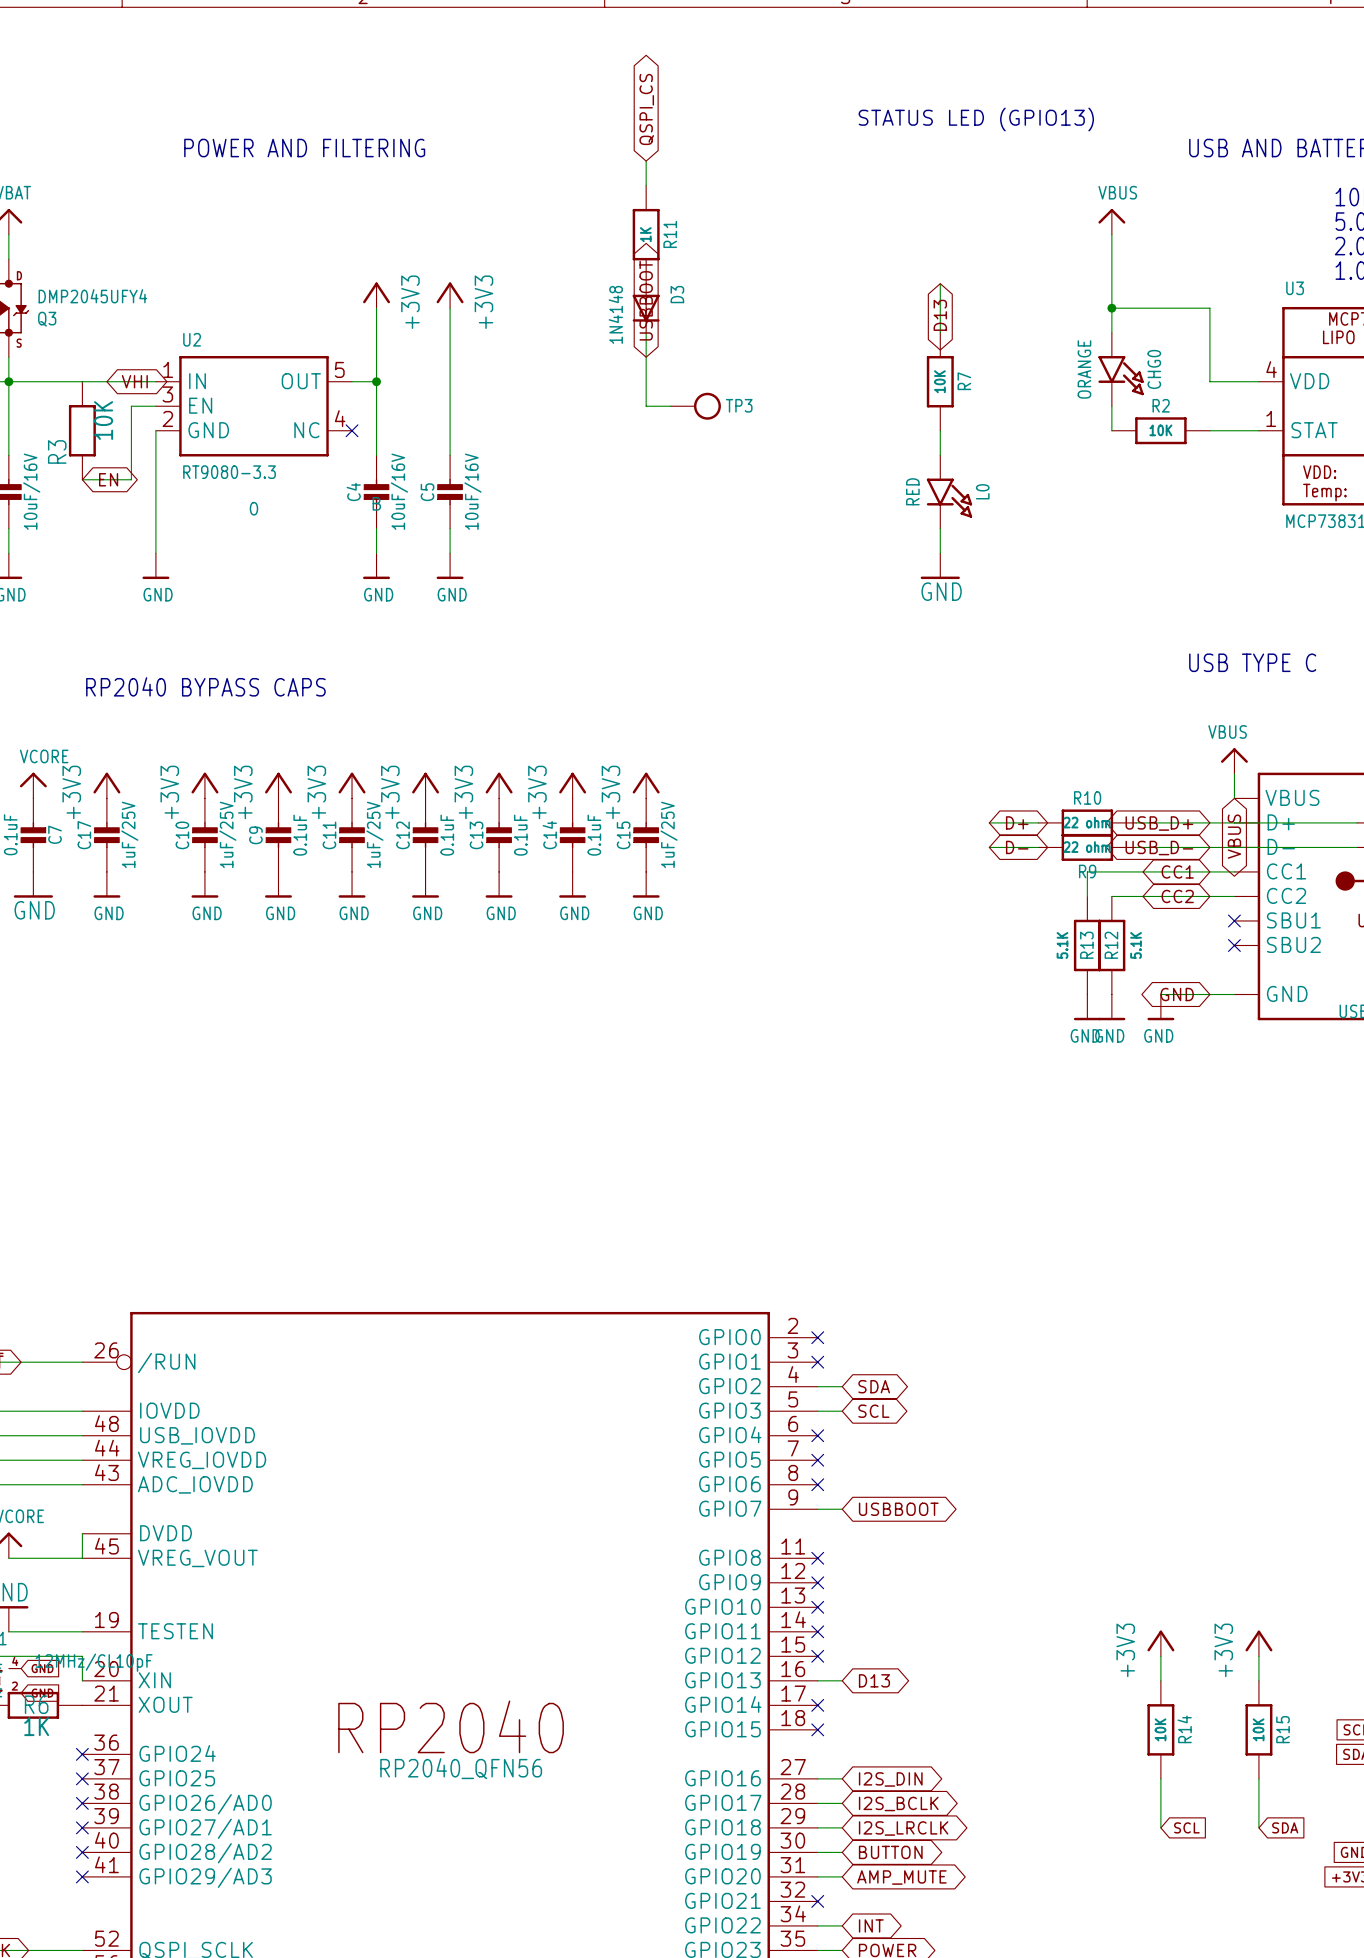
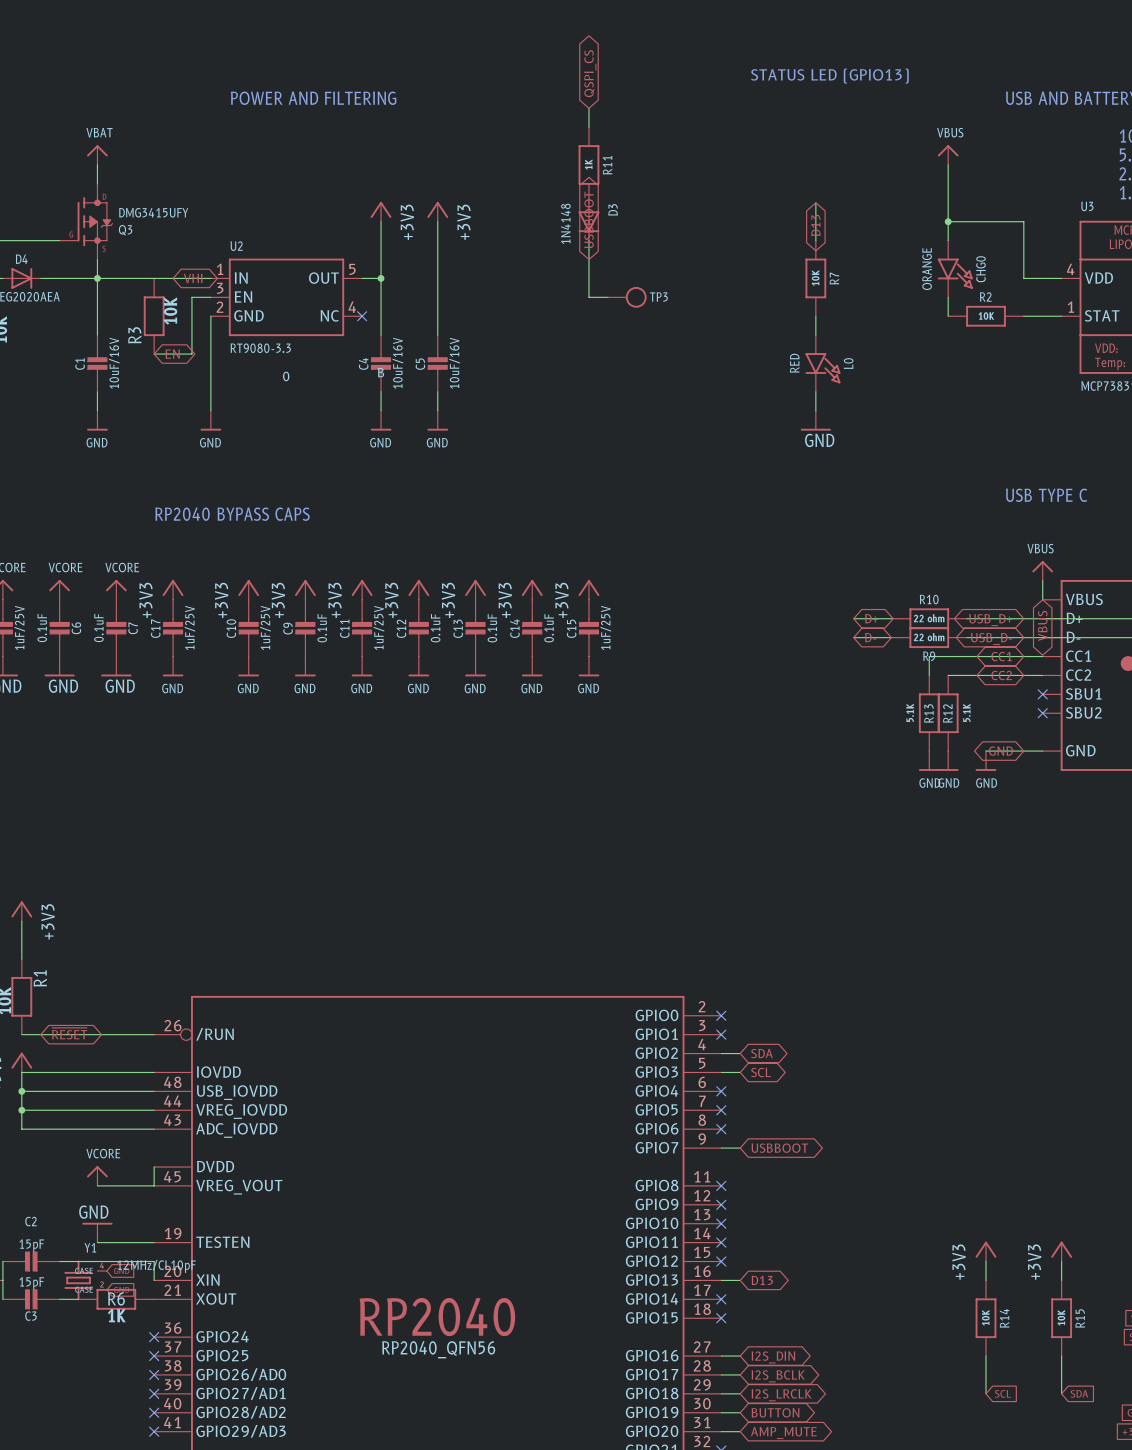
Q3 value: DMP2045UFY4 (92, 296) -> DMG3415UFY (153, 212)

